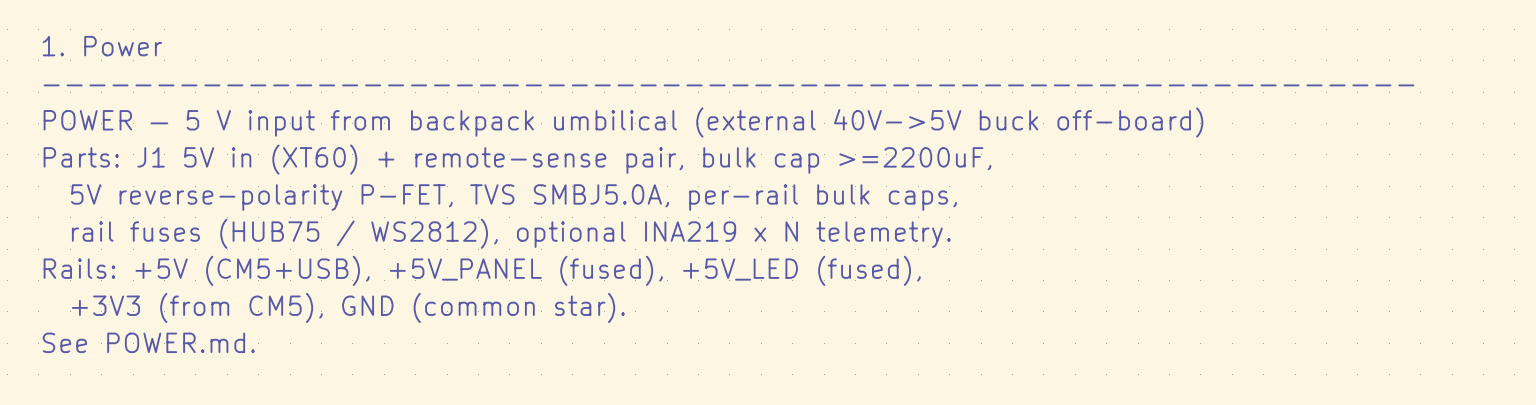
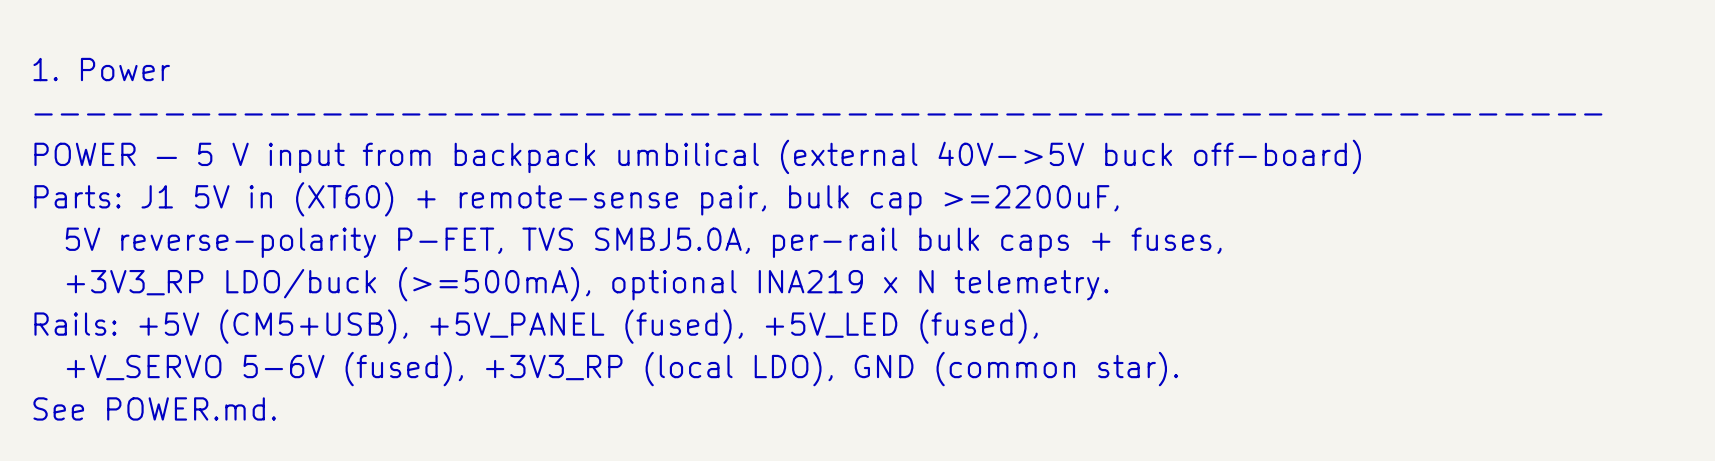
text: 5V reverse-polarity P-FET, TVS SMBJ5.0A, per-rail bulk caps, (513, 197) -> 5V reverse-polarity P-FET, TVS SMBJ5.0A, per-rail bulk caps + fuses, (643, 242)
text: rail fuses (HUB75 / WS2812), optional INA219 x N telemetry. (511, 233) -> +3V3_RP LDO/buck (>=500mA), optional INA219 x N telemetry. (587, 284)
text: +3V3 (from CM5), GND (common star). (348, 307) -> +V_SERVO 5-6V (fused), +3V3_RP (local LDO), GND (common star). (622, 369)

